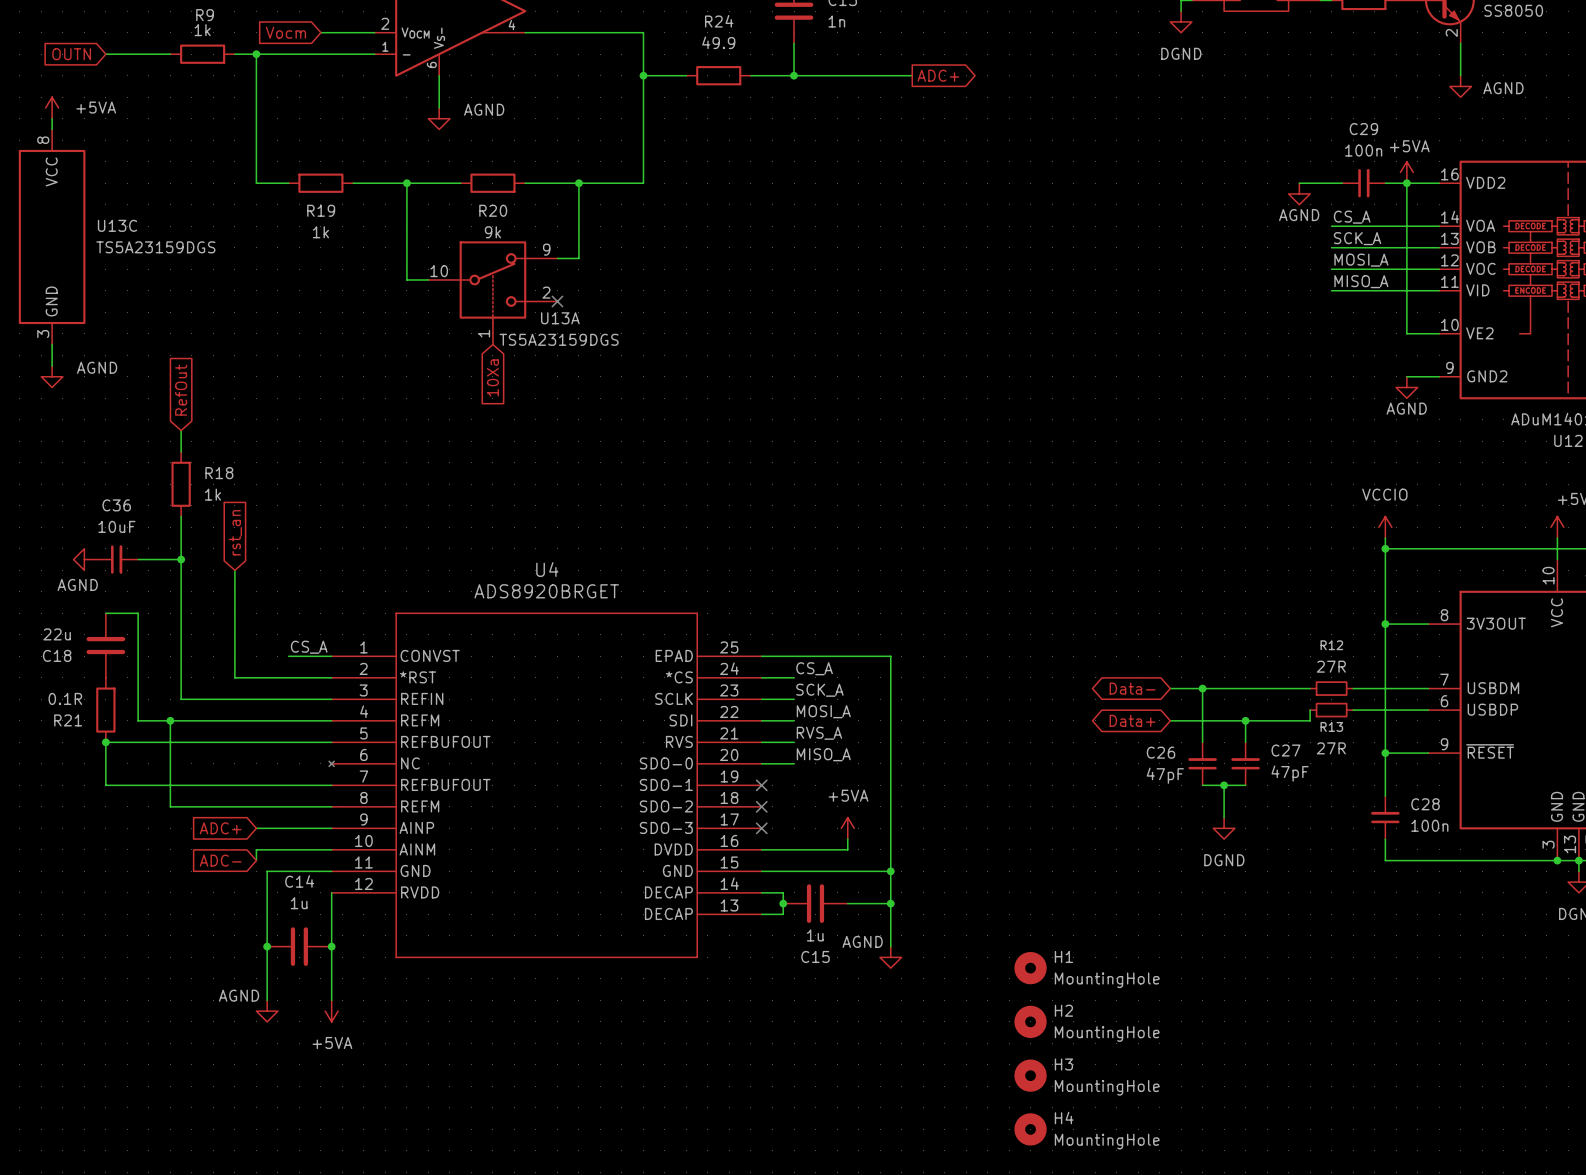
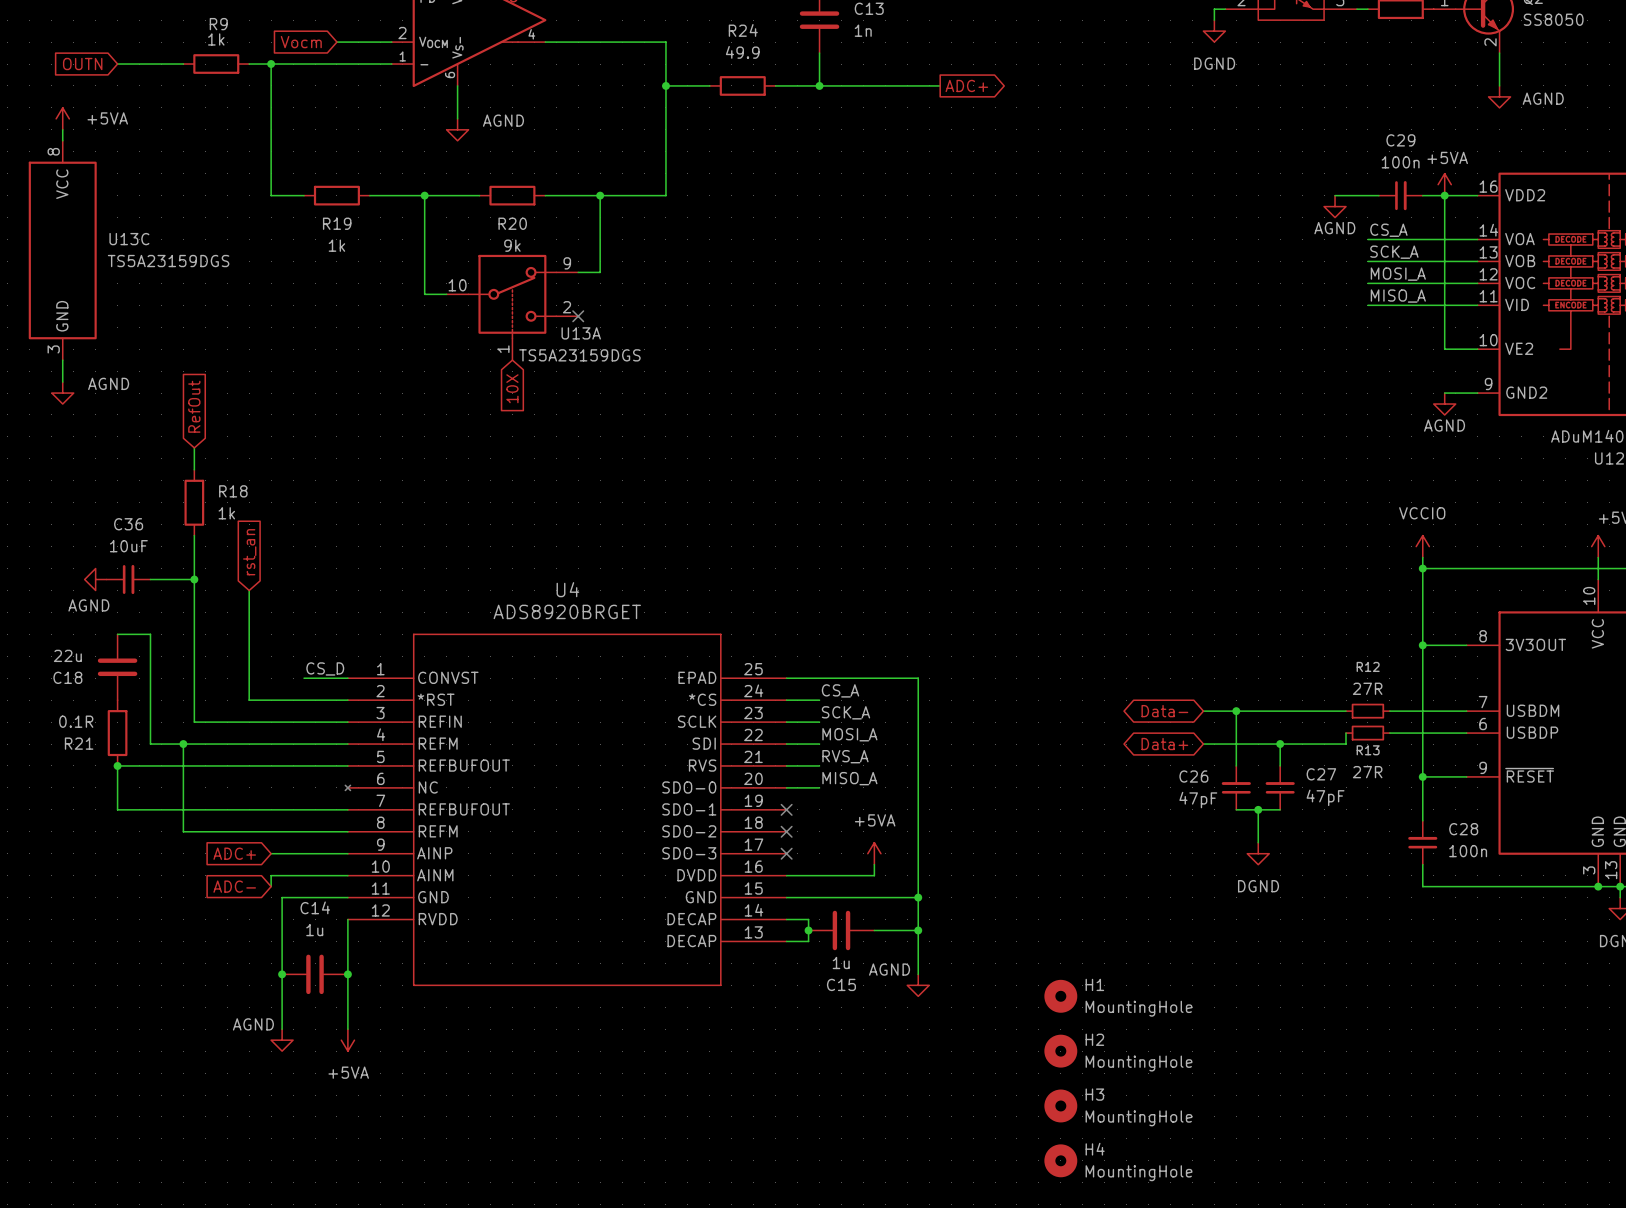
global label: 10Xa (492, 377) -> 10X (512, 388)
label: CS_A (309, 647) -> CS_D (325, 668)

